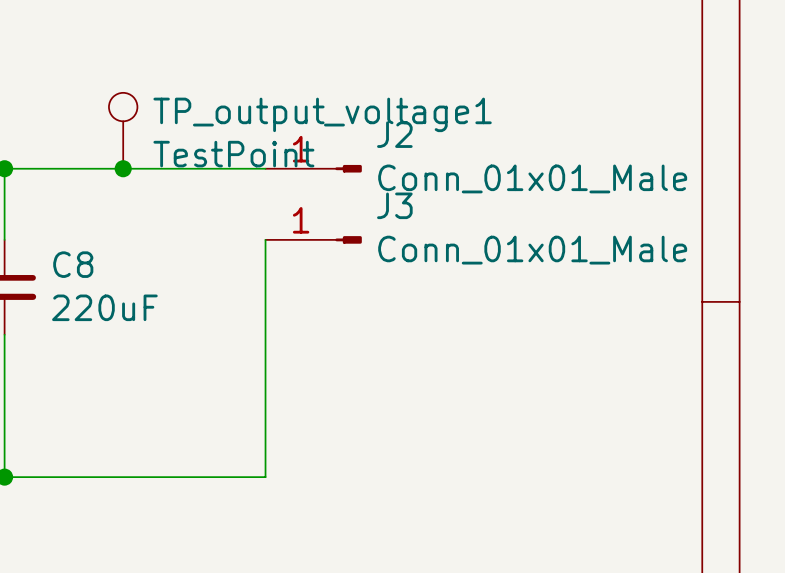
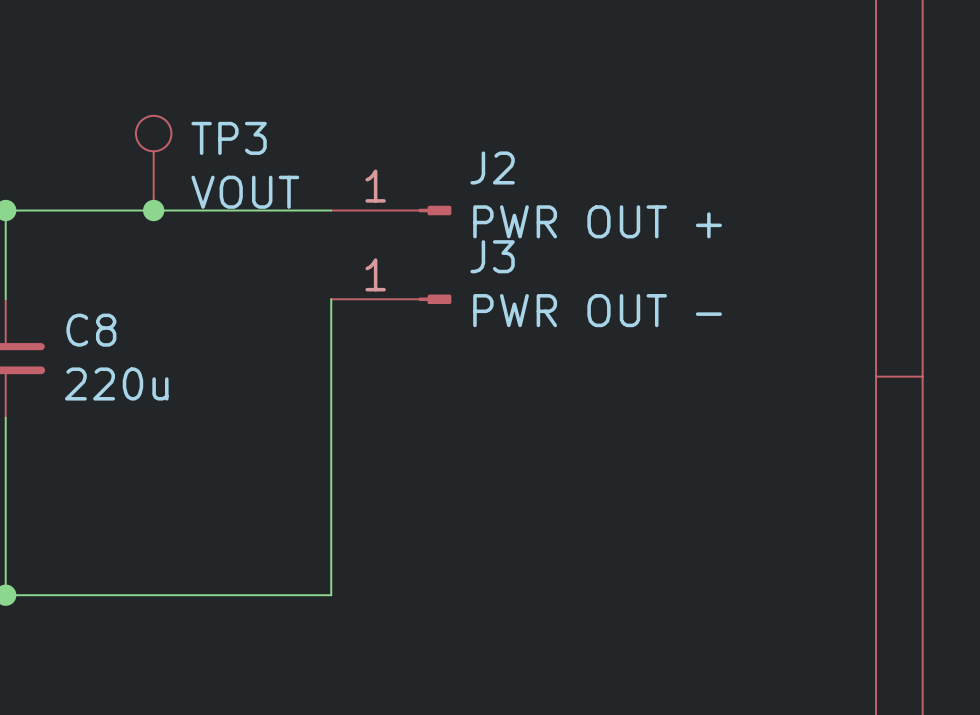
TP_output_voltage1 name: TP_output_voltage1 (322, 114) -> TP3 (229, 138)
TP_output_voltage1 value: TestPoint (233, 154) -> VOUT (245, 192)
J2 value: Conn_01x01_Male (532, 178) -> PWR OUT + (597, 221)
J3 value: Conn_01x01_Male (532, 250) -> PWR OUT - (597, 310)
C8 value: 220uF (104, 307) -> 220u (116, 383)

